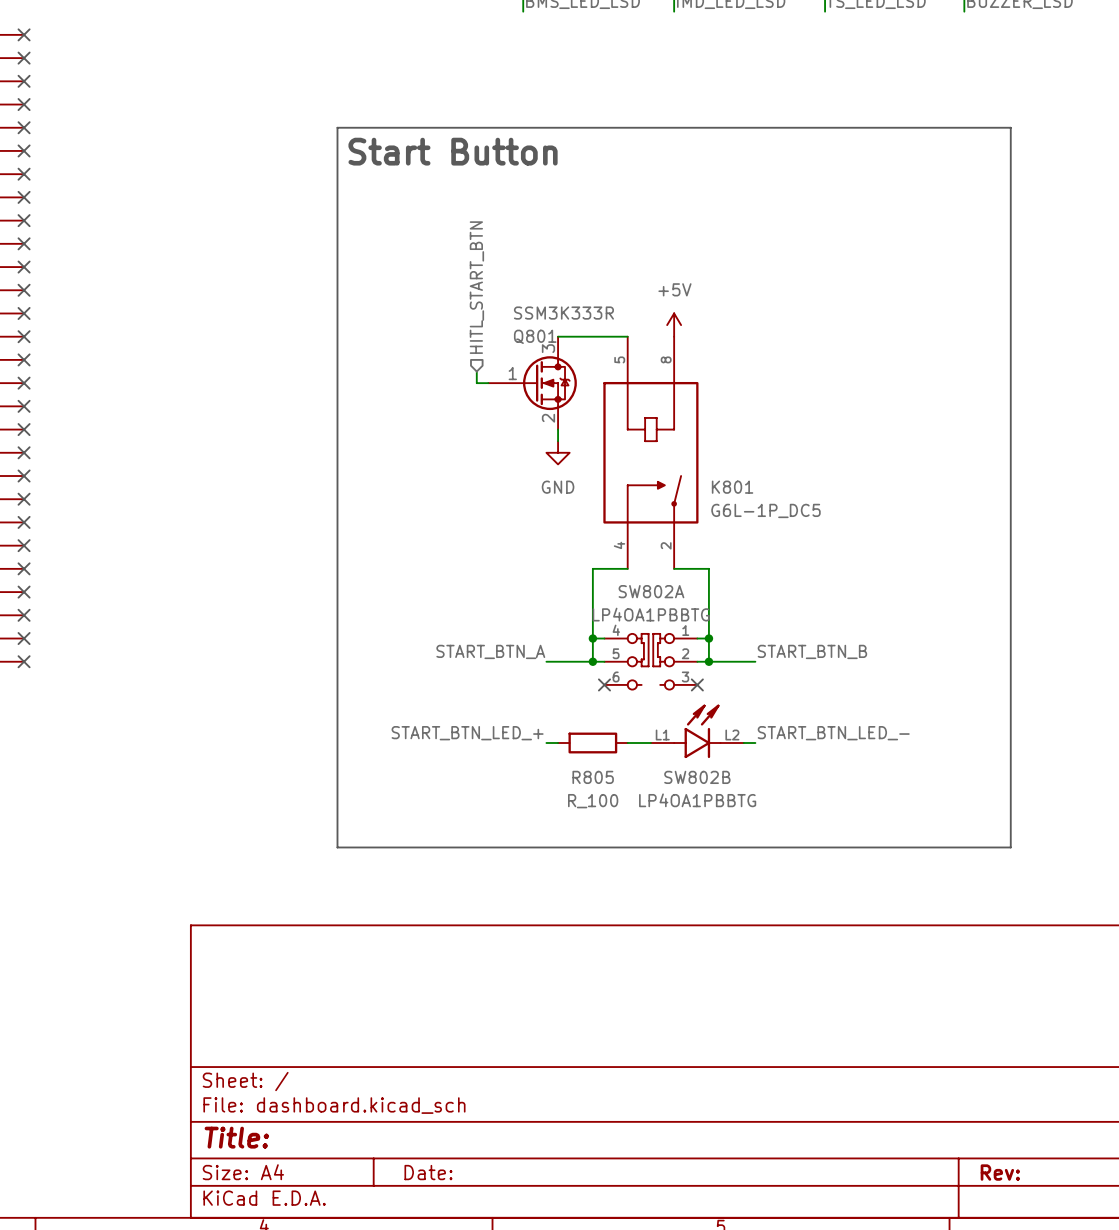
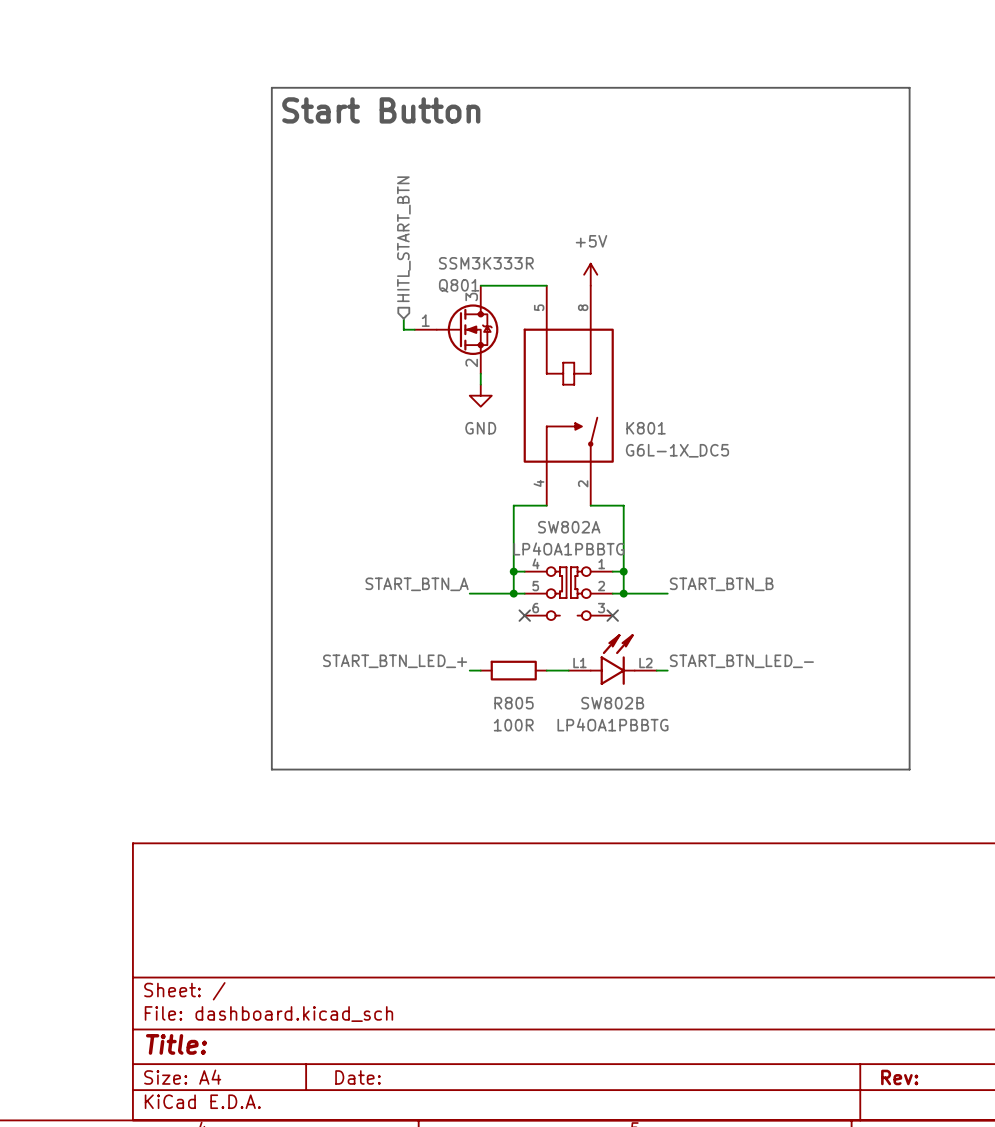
Q801 symbol: [488, 336, 577, 430] -> [414, 285, 499, 374]
K801 value: G6L-1P_DC5 (765, 510) -> G6L-1X_DC5 (677, 450)
R805 value: R_100 (593, 801) -> 100R (513, 725)

